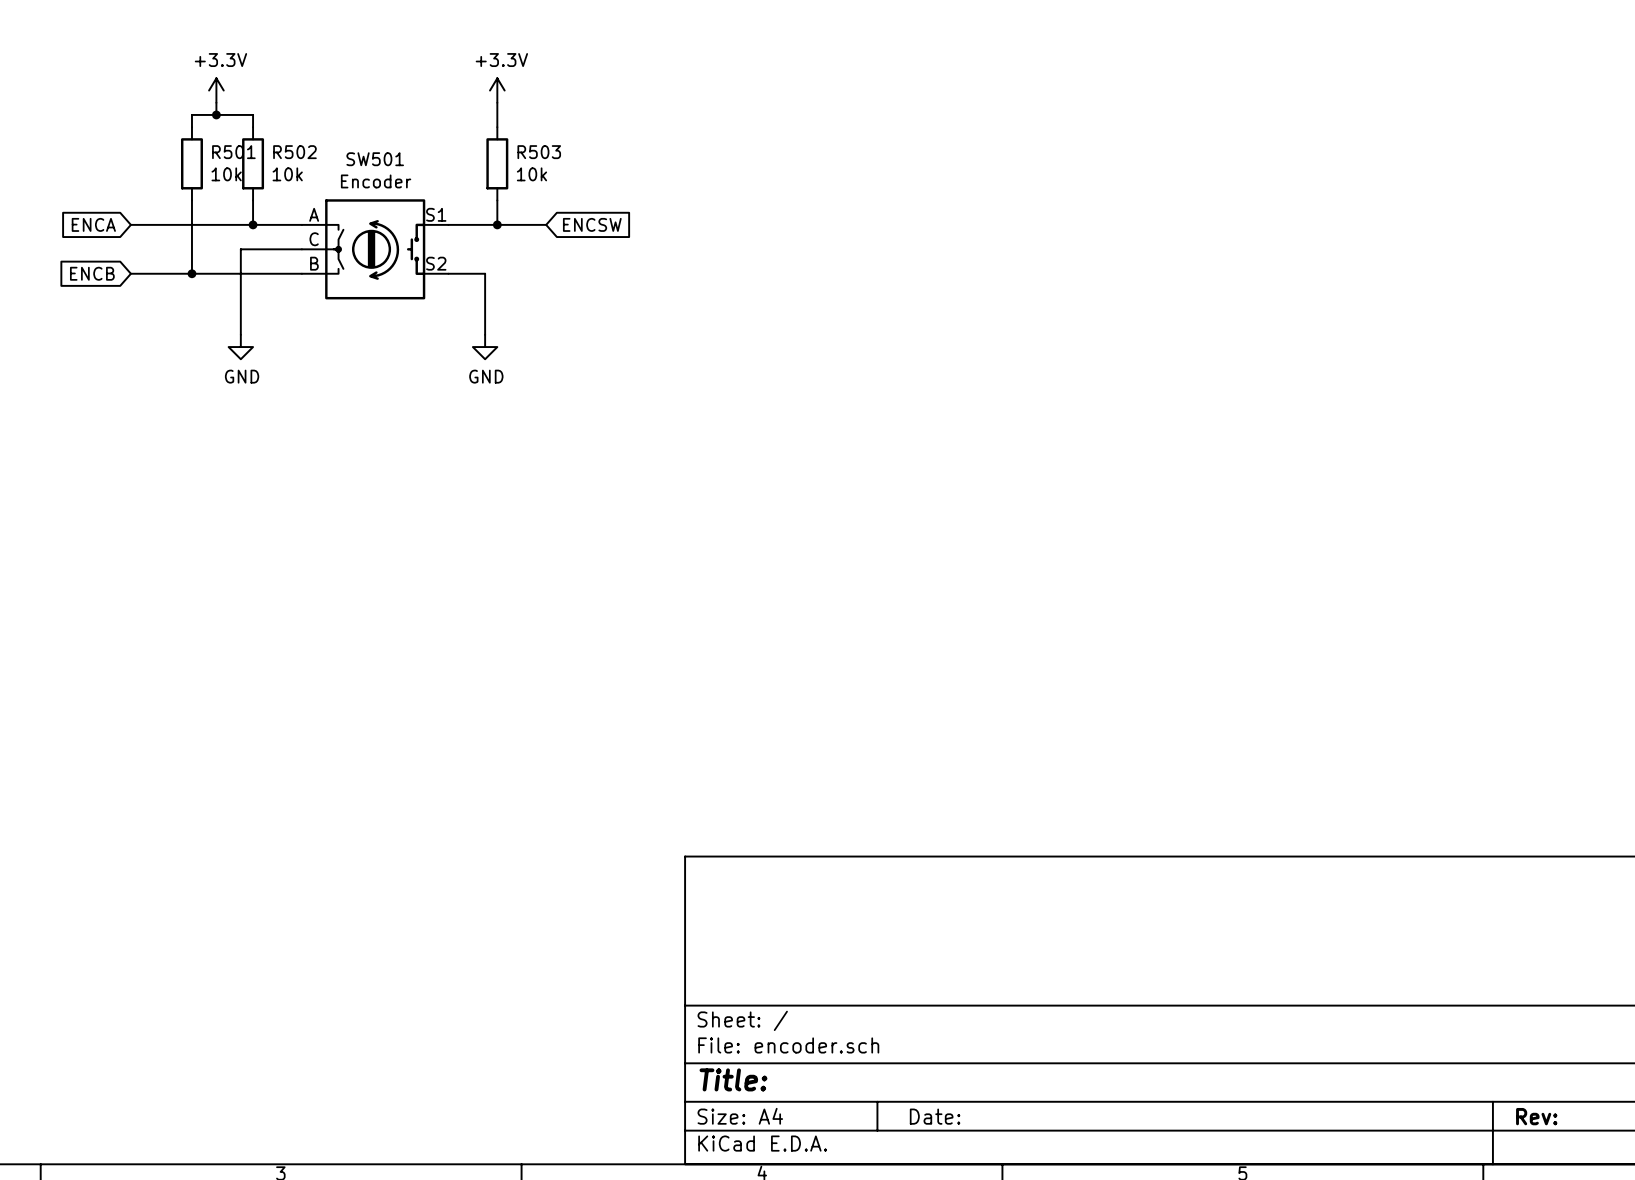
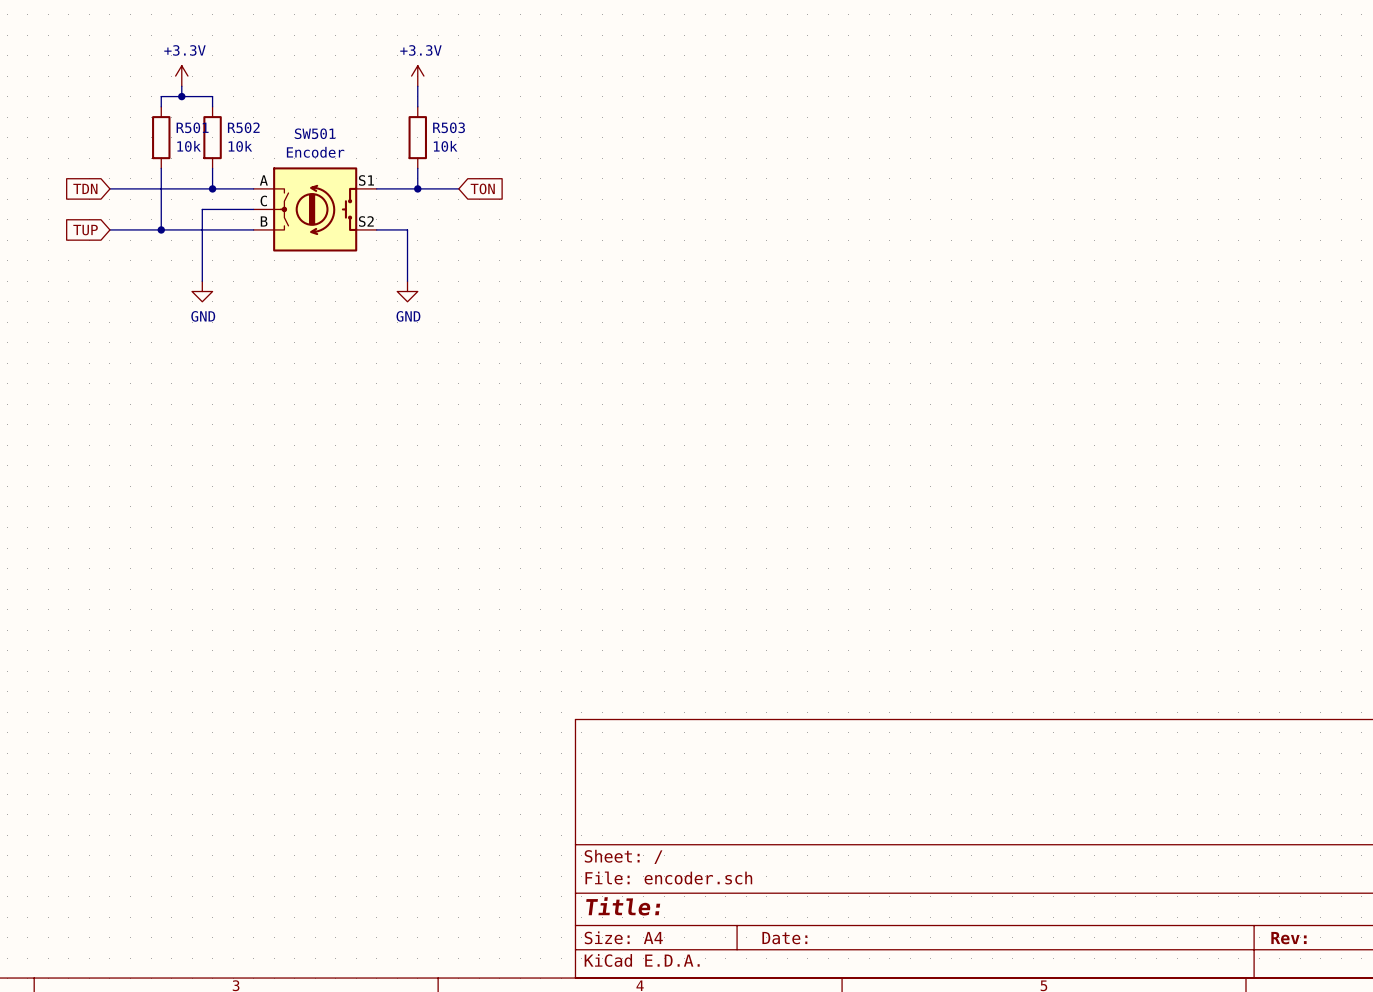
global label: ENCA (93, 224) -> TDN (85, 188)
global label: ENCSW (592, 224) -> TON (482, 188)
global label: ENCB (92, 273) -> TUP (85, 230)

